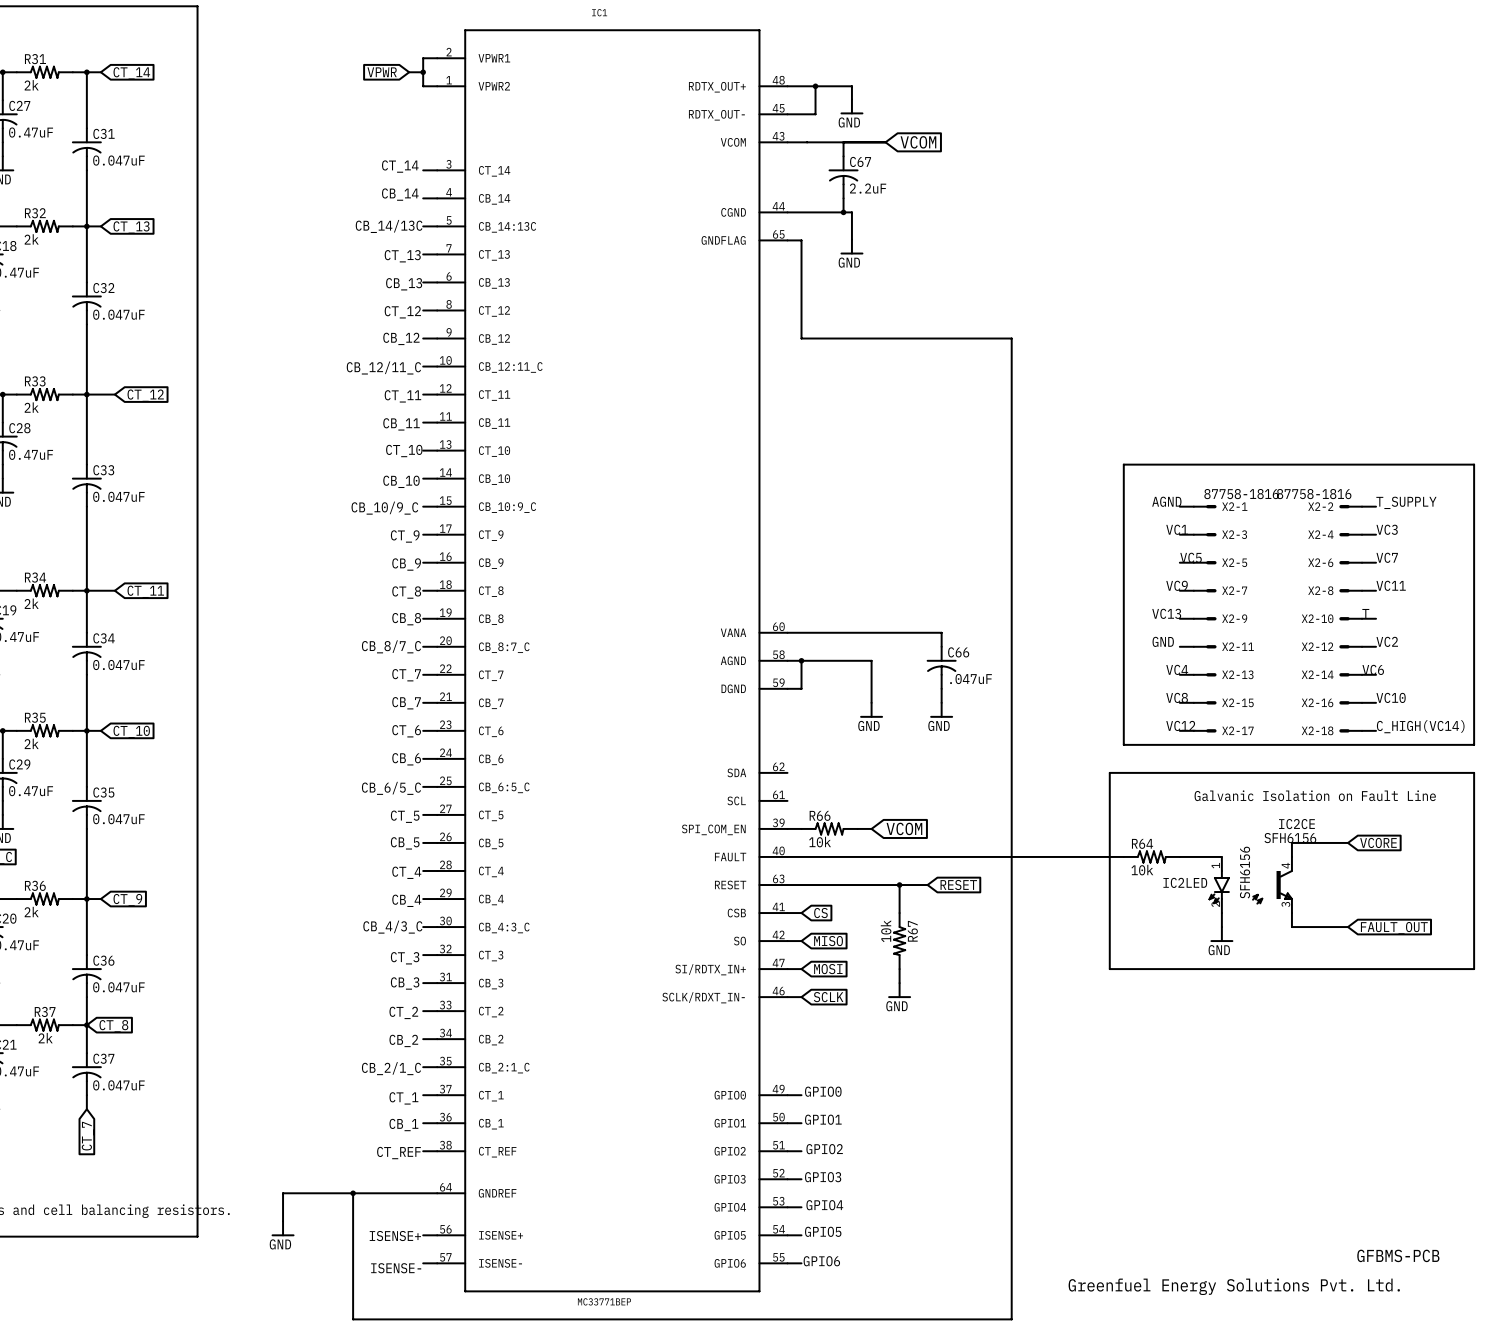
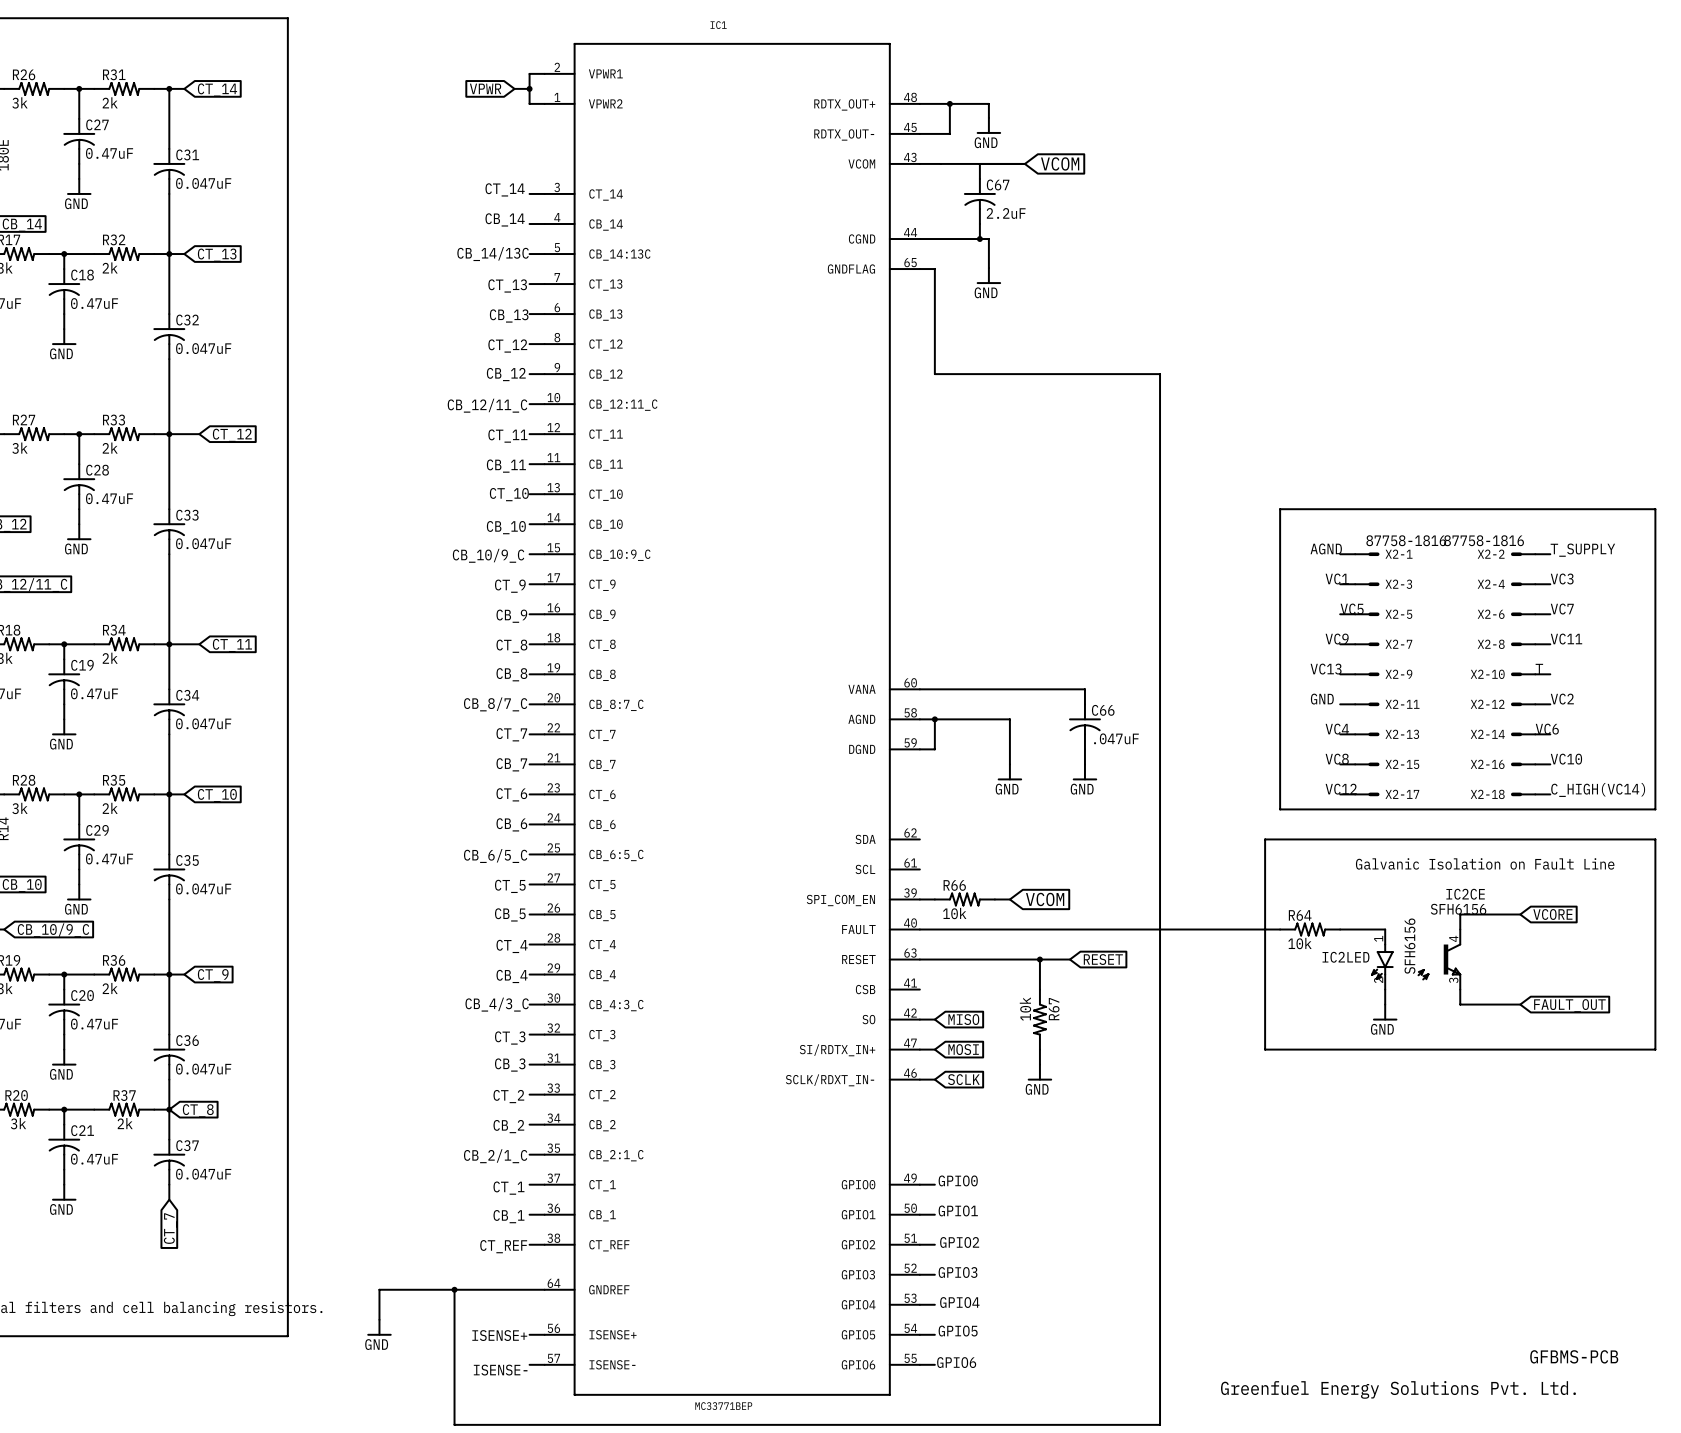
wire: (787, 913) (801, 913) -> none
global label: CS (820, 913) -> none

